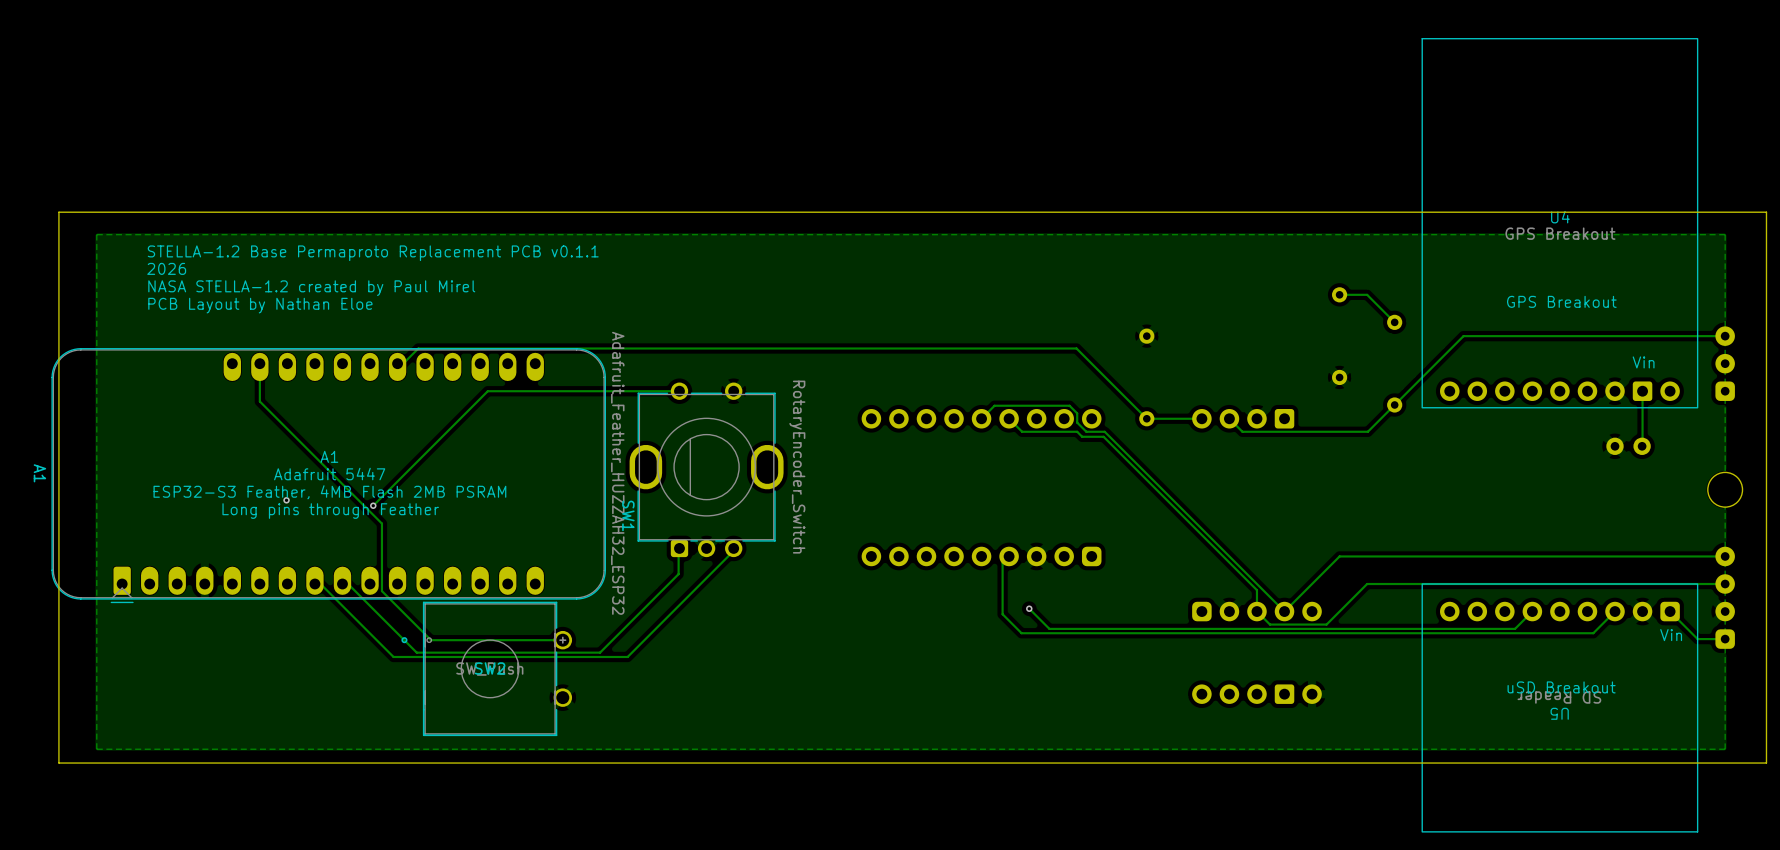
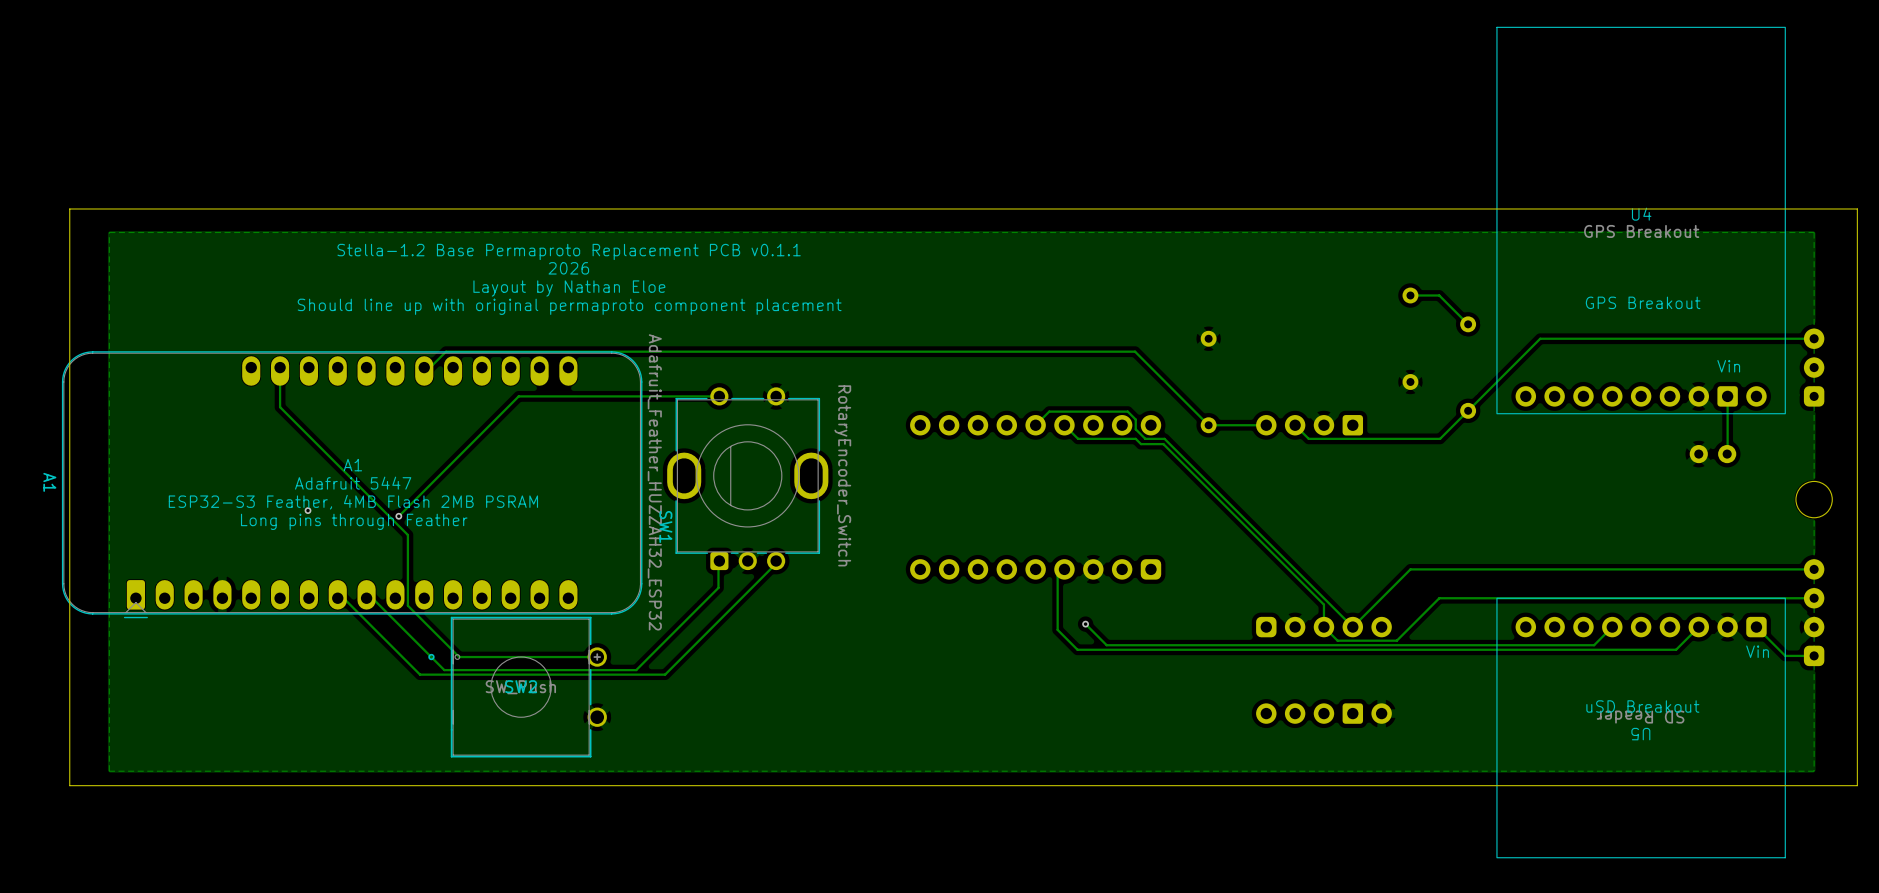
text: STELLA-1.2 Base Permaproto Replacement PCB v0.1.1 (373, 253) -> none
text: none -> Stella-1.2 Base Permaproto Replacement PCB v0.1.1 (569, 251)
text: 2026 (166, 268) -> none
text: none -> 2026 (568, 268)
text: NASA STELLA-1.2 created by Paul Mirel (311, 288) -> none
text: none -> Layout by Nathan Eloe (569, 288)
text: PCB Layout by Nathan Eloe (260, 305) -> none
text: none -> Should line up with original permaproto component placement (569, 306)

